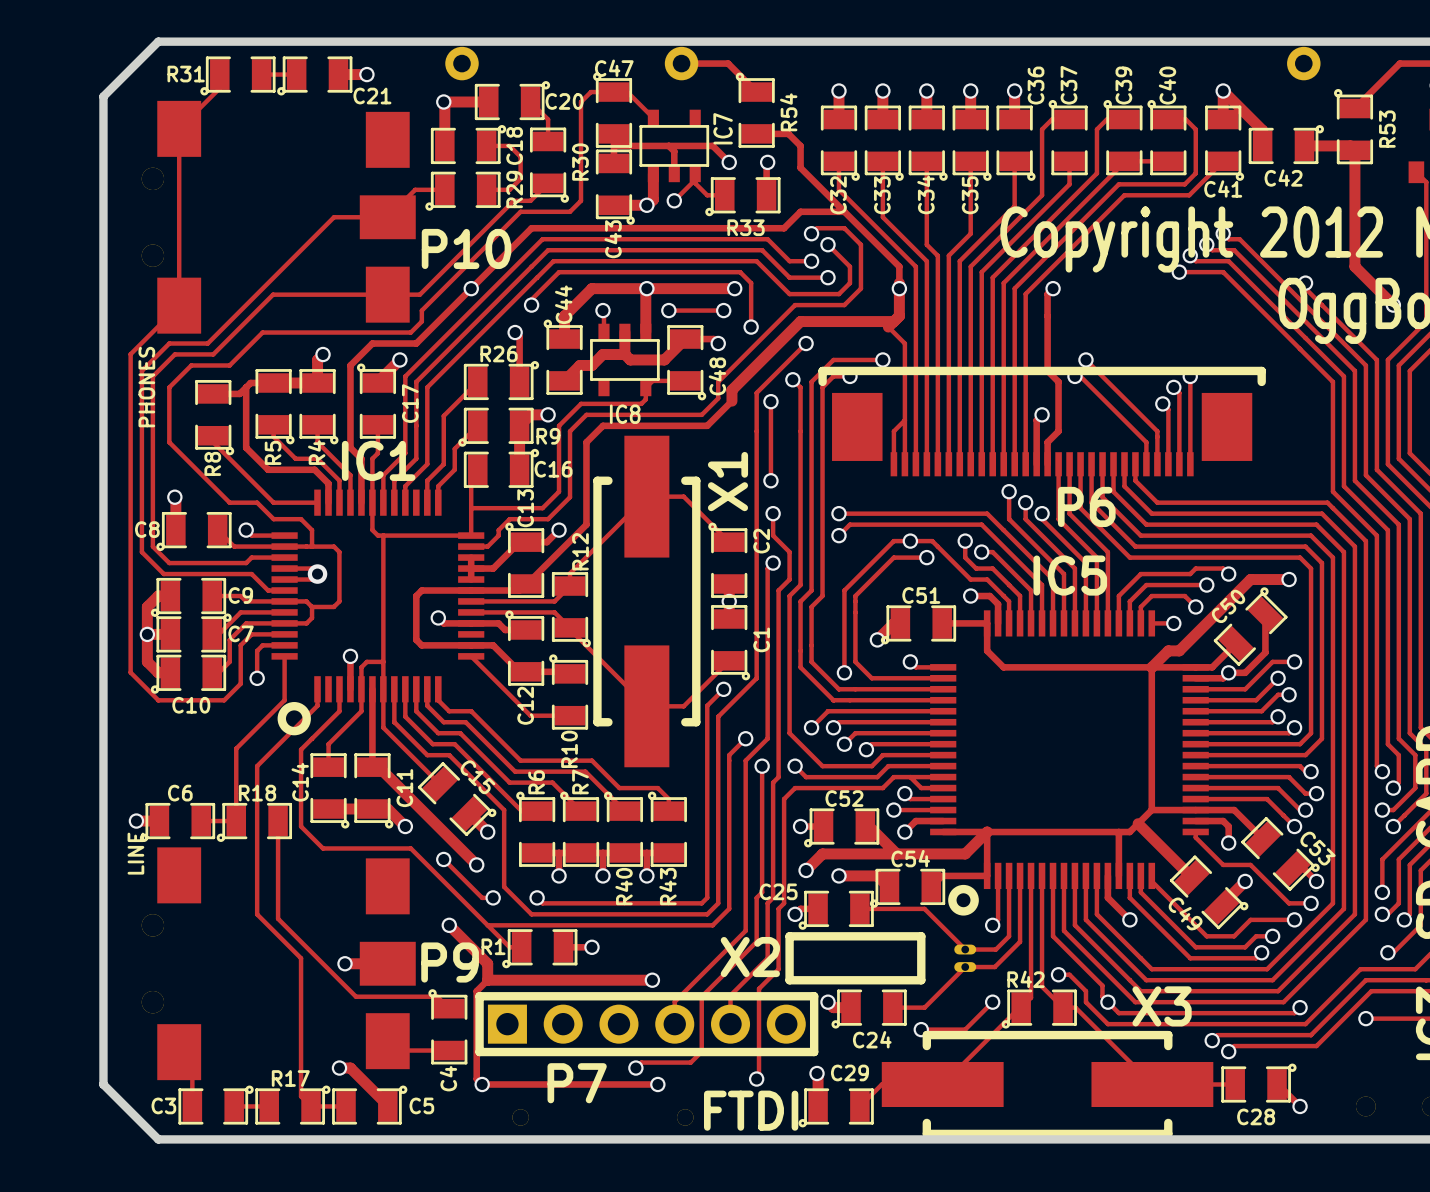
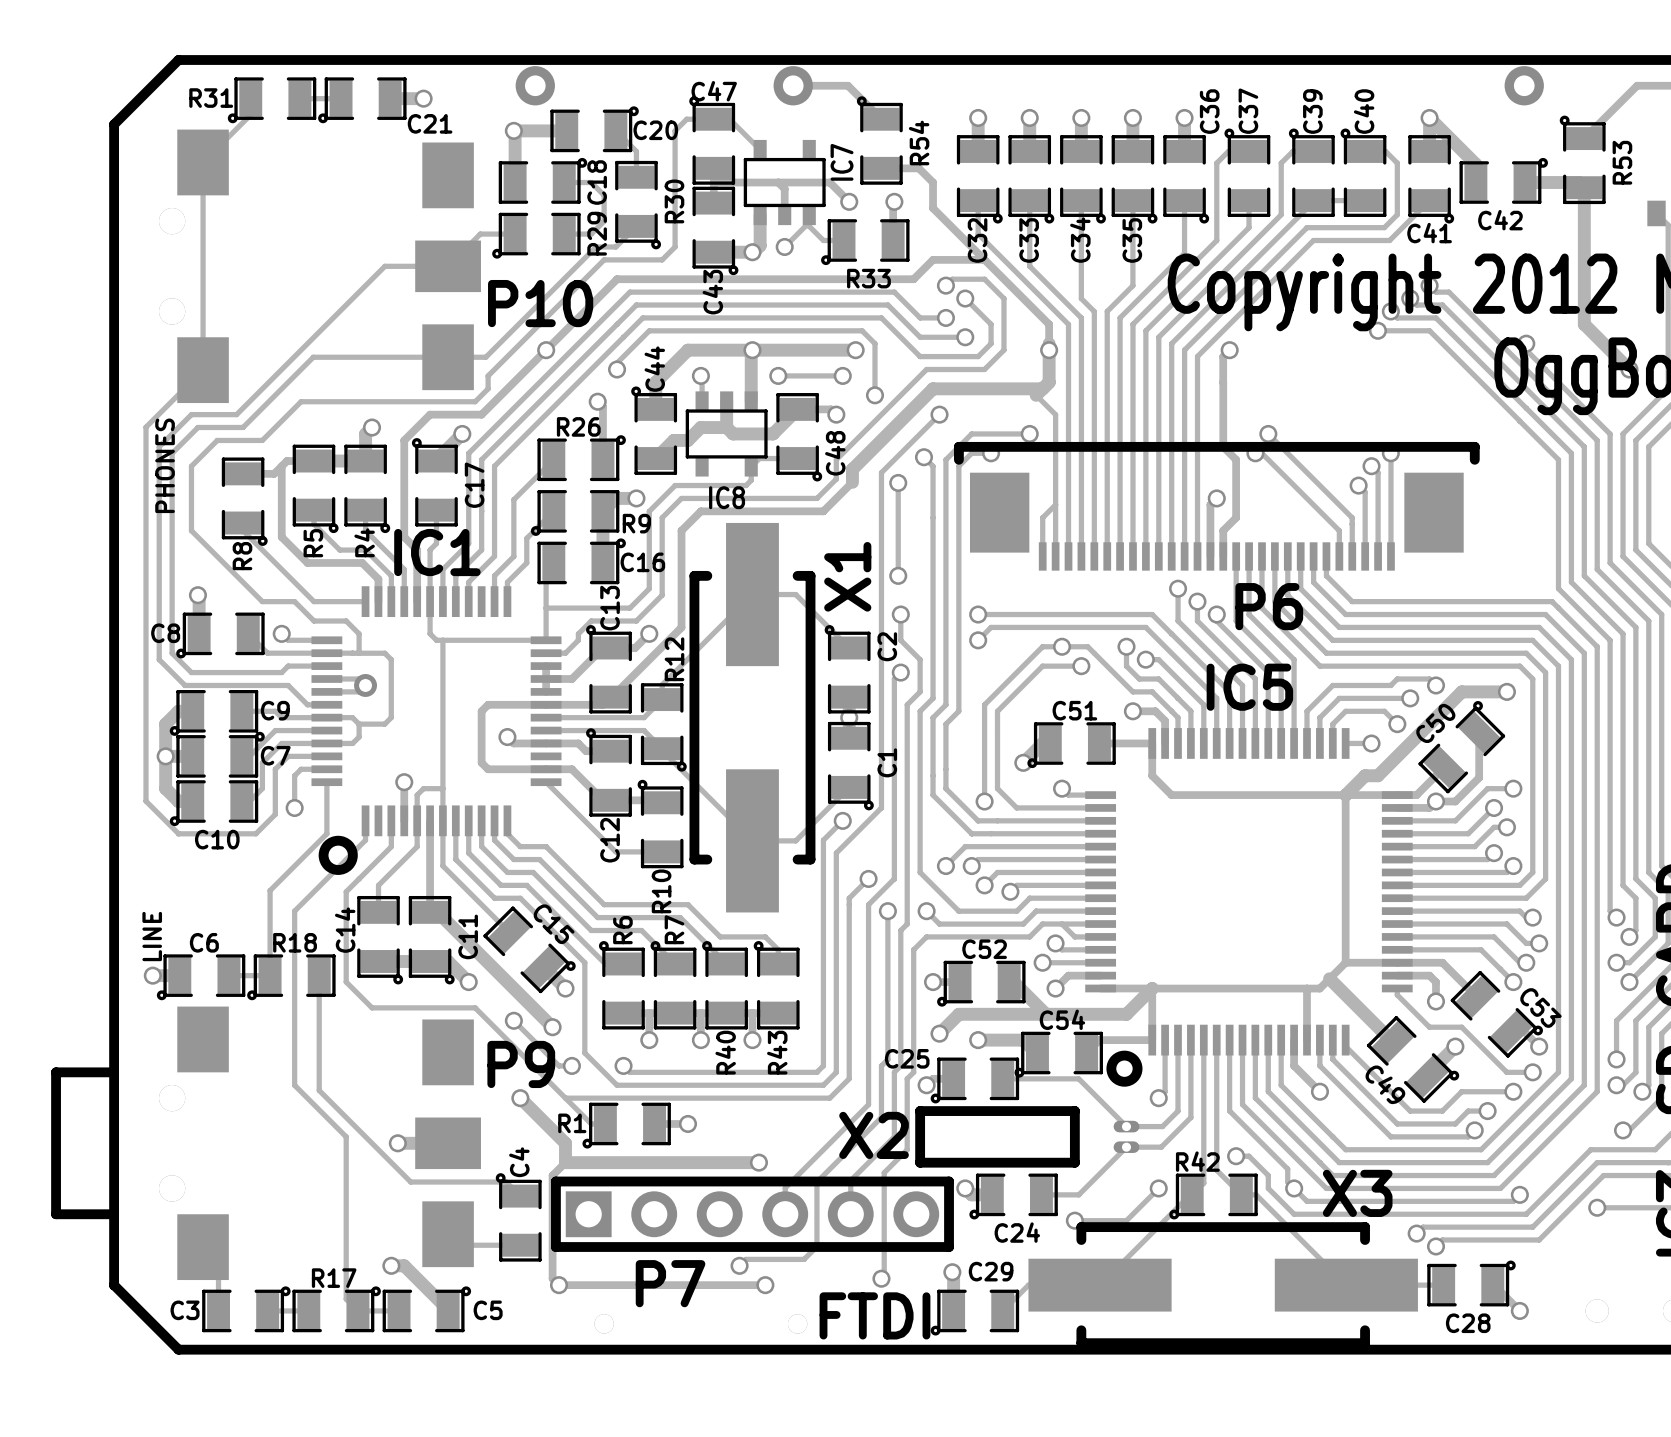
P9 footprint: [141, 847, 416, 1081] -> [51, 1006, 481, 1281]
P9 value position: LINE (135, 853) -> LINE (152, 936)
P9 name position: P9 (450, 962) -> P9 (521, 1064)
C4 name position: C4 (448, 1078) -> C4 (519, 1162)

